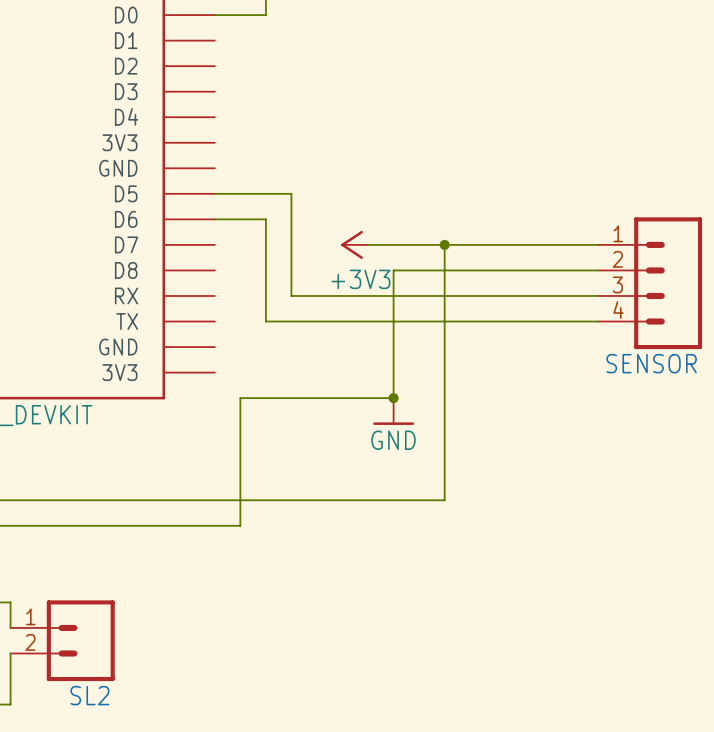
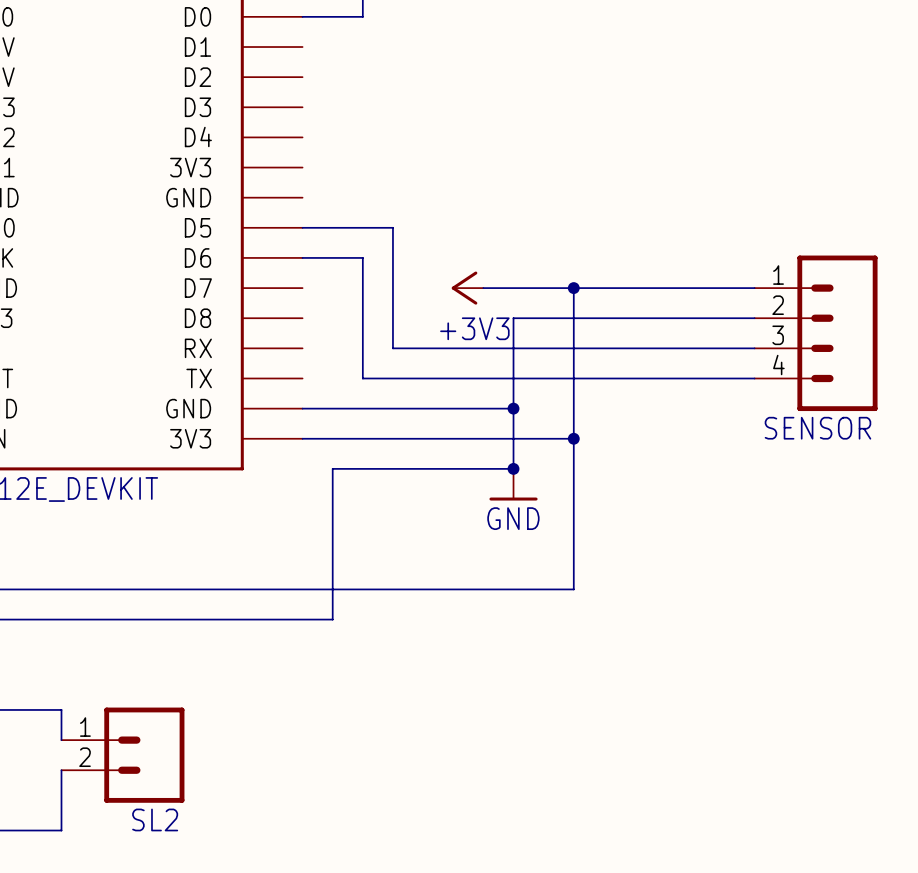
wire: none -> (302, 408) (513, 408)
junction: none -> (513, 408)
wire: none -> (302, 438) (573, 438)
junction: none -> (573, 438)

